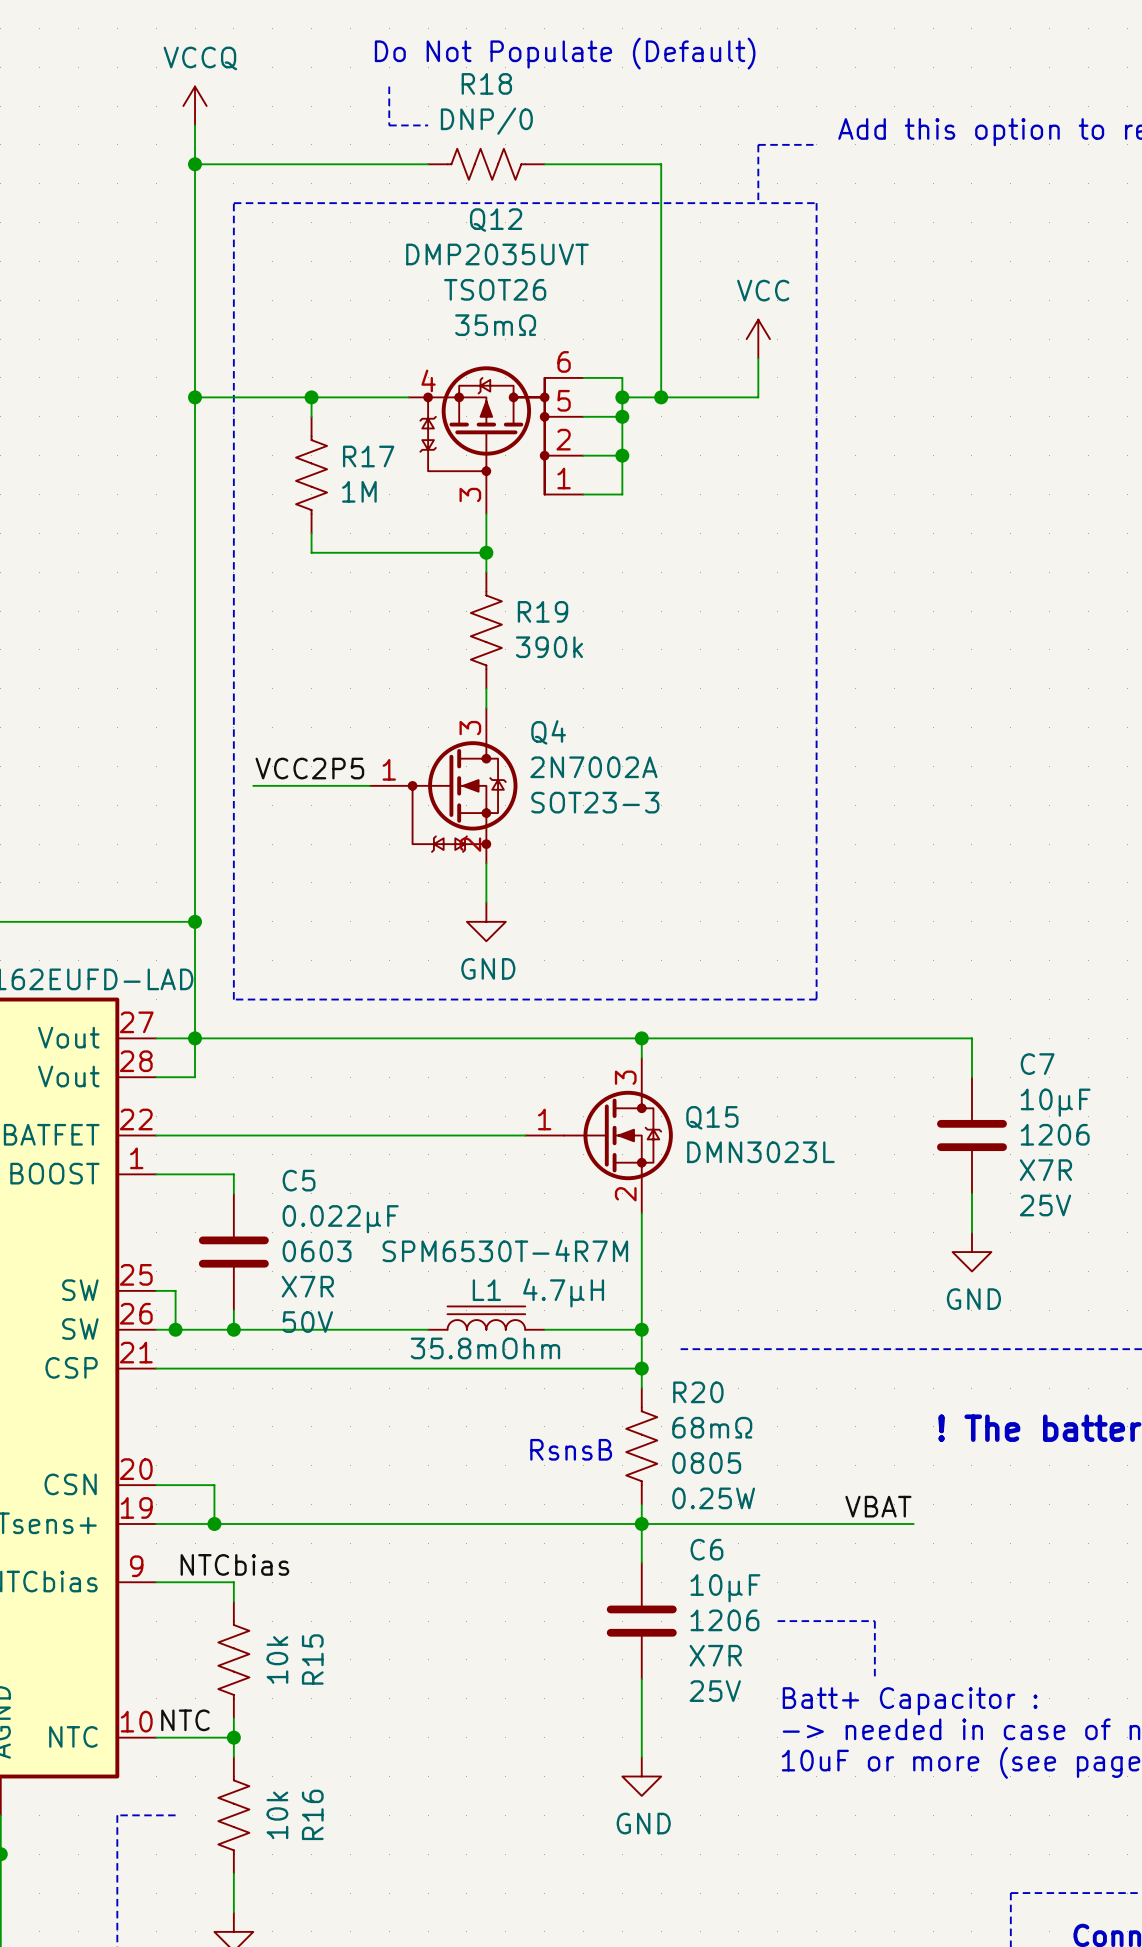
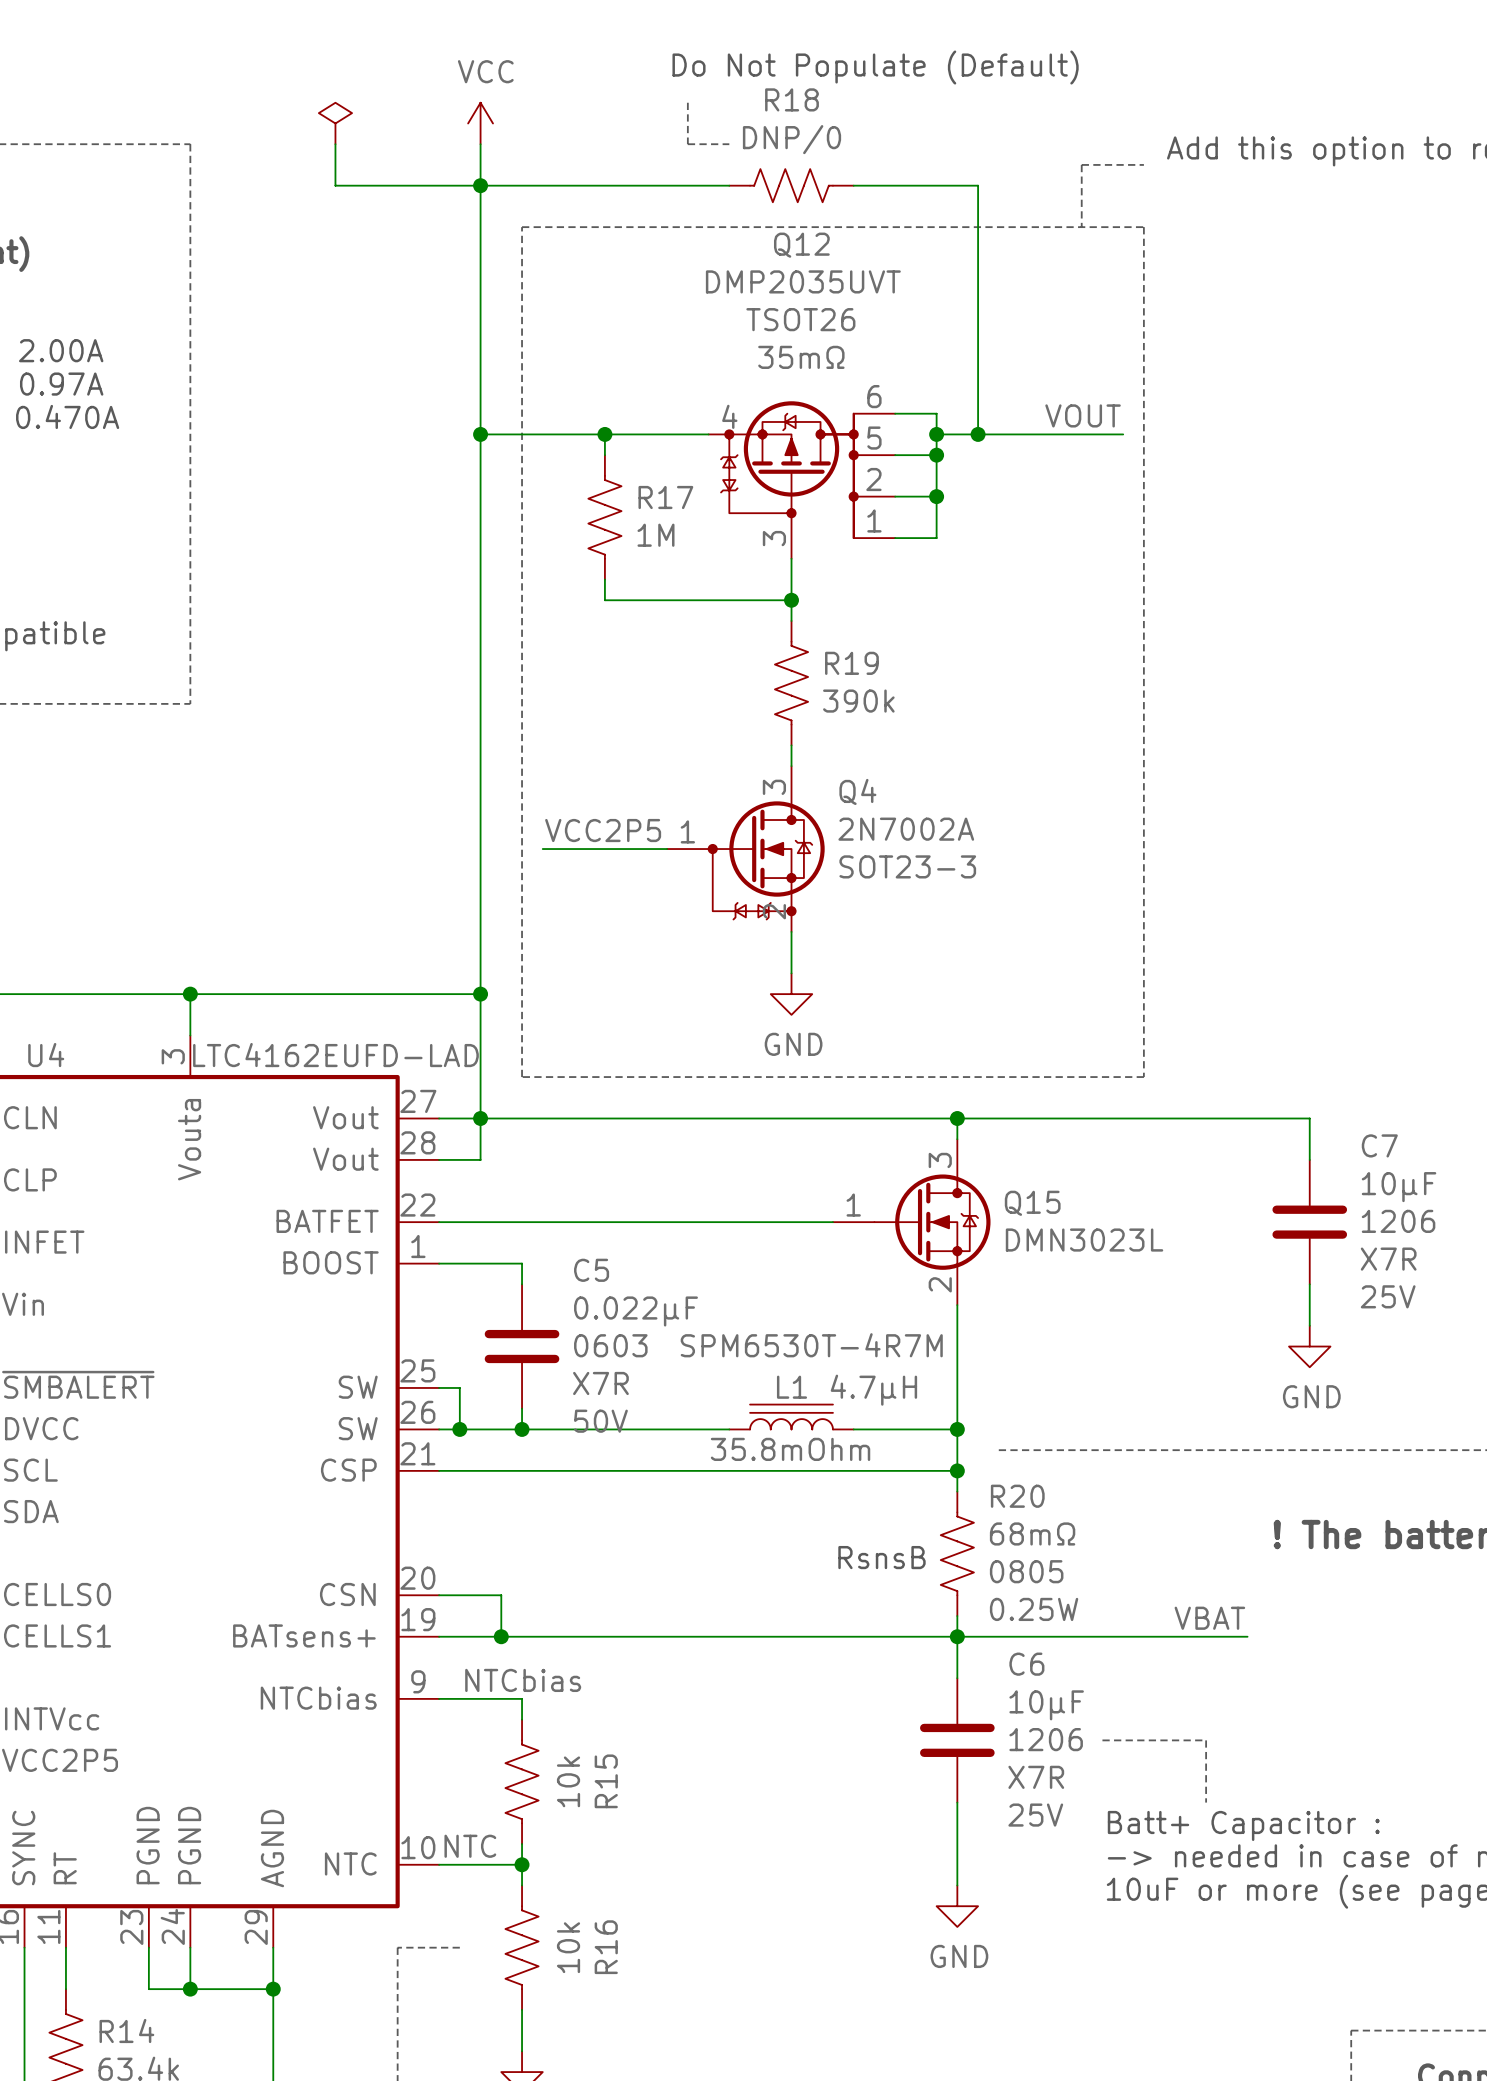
power symbol: none -> (335, 123)
power symbol: VCCQ (195, 106) -> VCC (480, 123)
wire: none -> (335, 144) (335, 185) (480, 185)
power symbol: VCC (758, 339) -> none
wire: (758, 358) (758, 397) -> (1123, 434) (1081, 434)
label: none -> VOUT (1083, 415)

